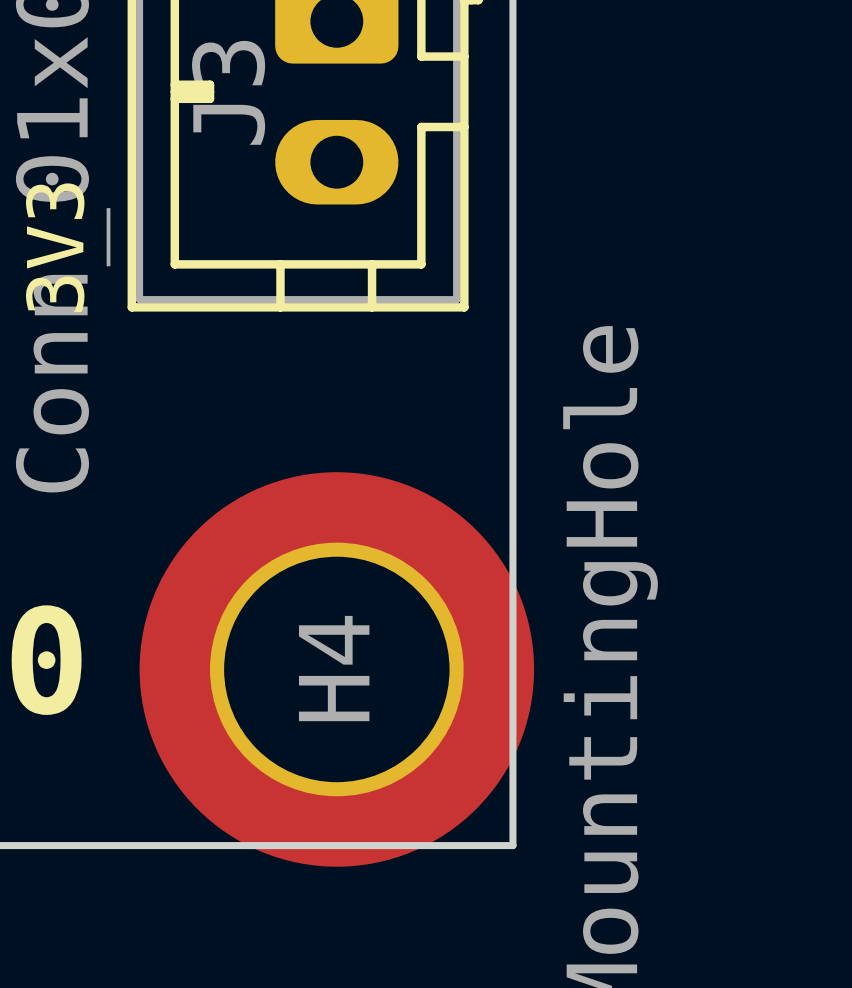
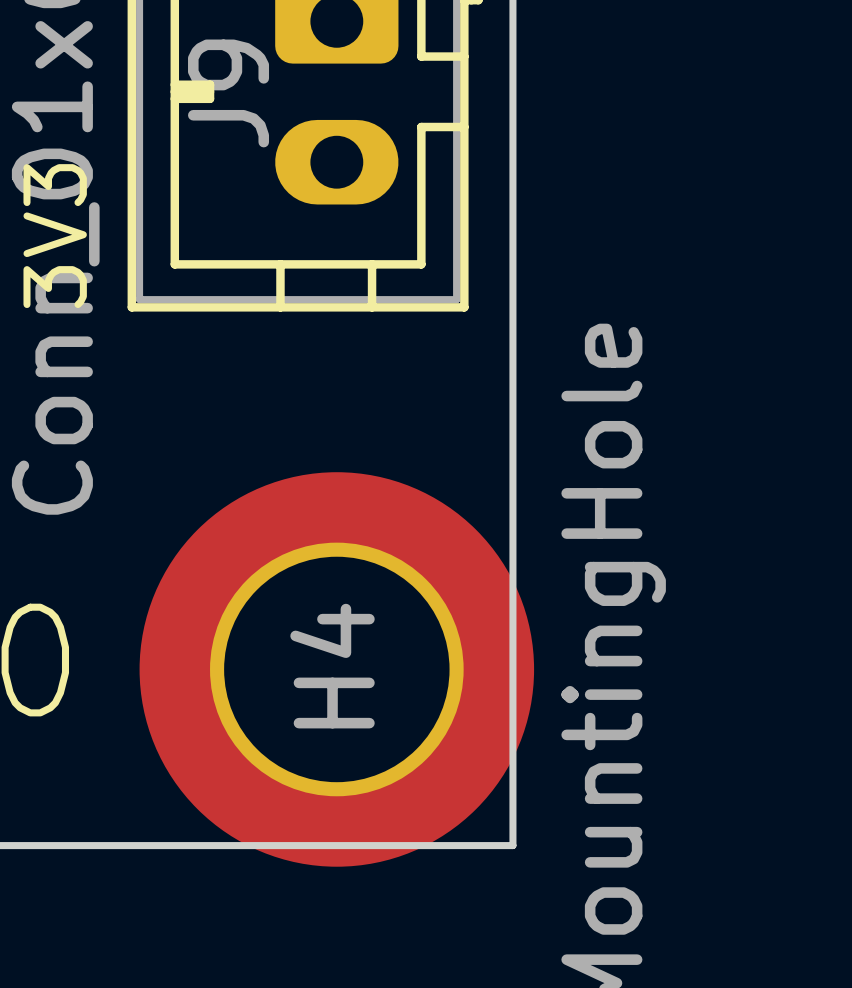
J3 name: J3 (228, 92) -> J9 (228, 93)

